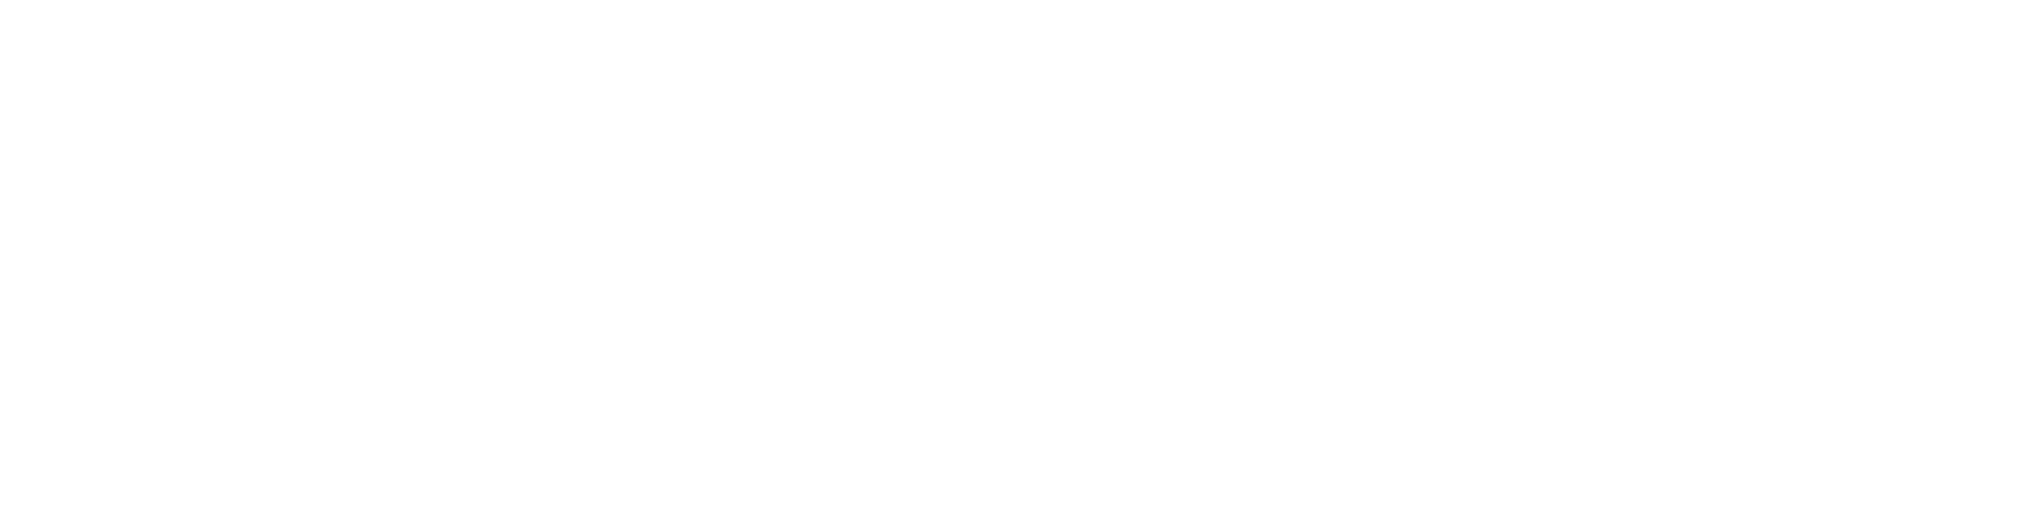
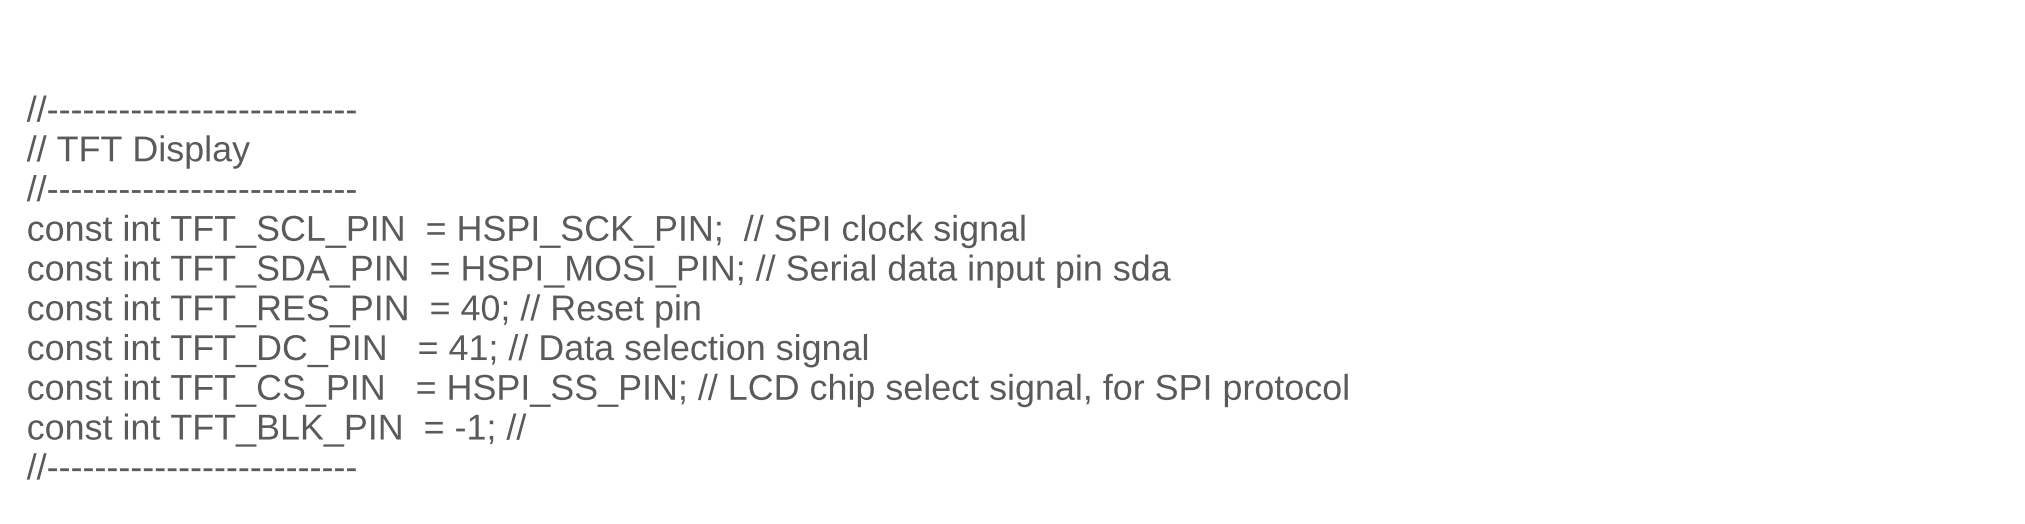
text: none -> //-------------------------- (191, 108)
text: none -> // TFT Display (138, 151)
text: none -> //-------------------------- (191, 188)
text: none -> const int TFT_SCL_PIN = HSPI_SCK_PIN; // SPI clock signal (526, 231)
text: none -> const int TFT_SDA_PIN = HSPI_MOSI_PIN; // Serial data input pin sda (599, 271)
text: none -> const int TFT_RES_PIN = 40; // Reset pin (363, 310)
text: none -> const int TFT_DC_PIN = 41; // Data selection signal (447, 350)
text: none -> const int TFT_CS_PIN = HSPI_SS_PIN; // LCD chip select signal, for SPI protocol (687, 390)
text: none -> const int TFT_BLK_PIN = -1; // (277, 430)
text: none -> //-------------------------- (191, 466)

